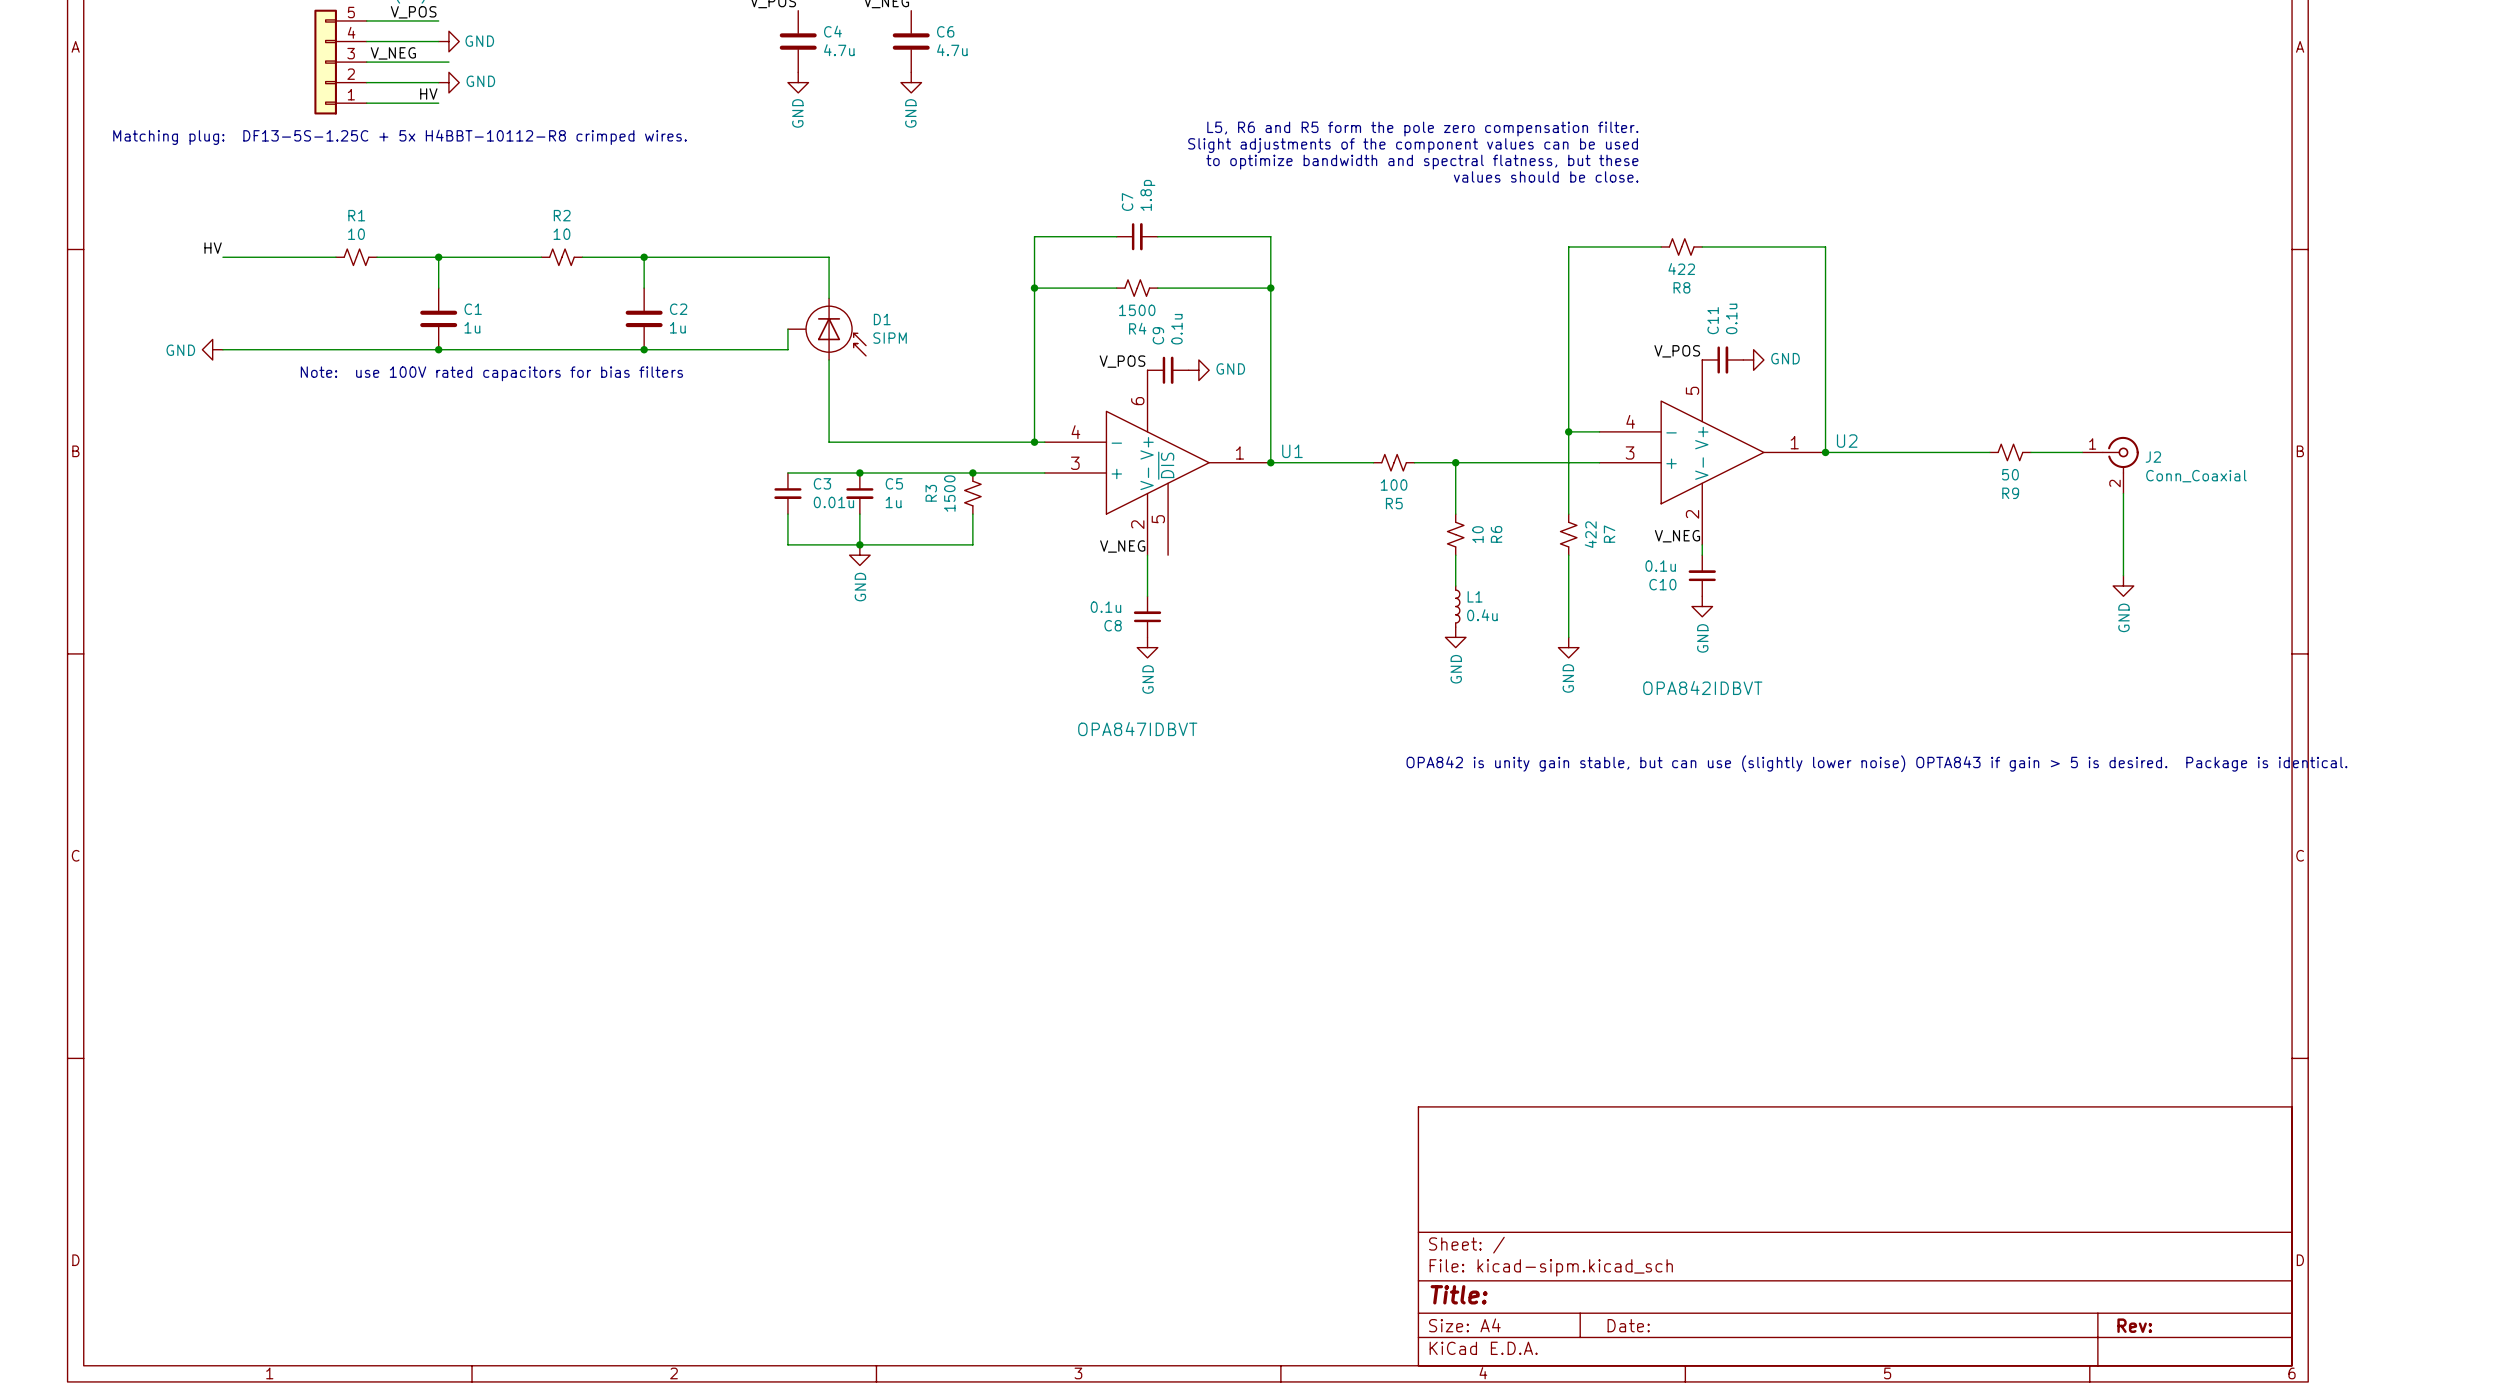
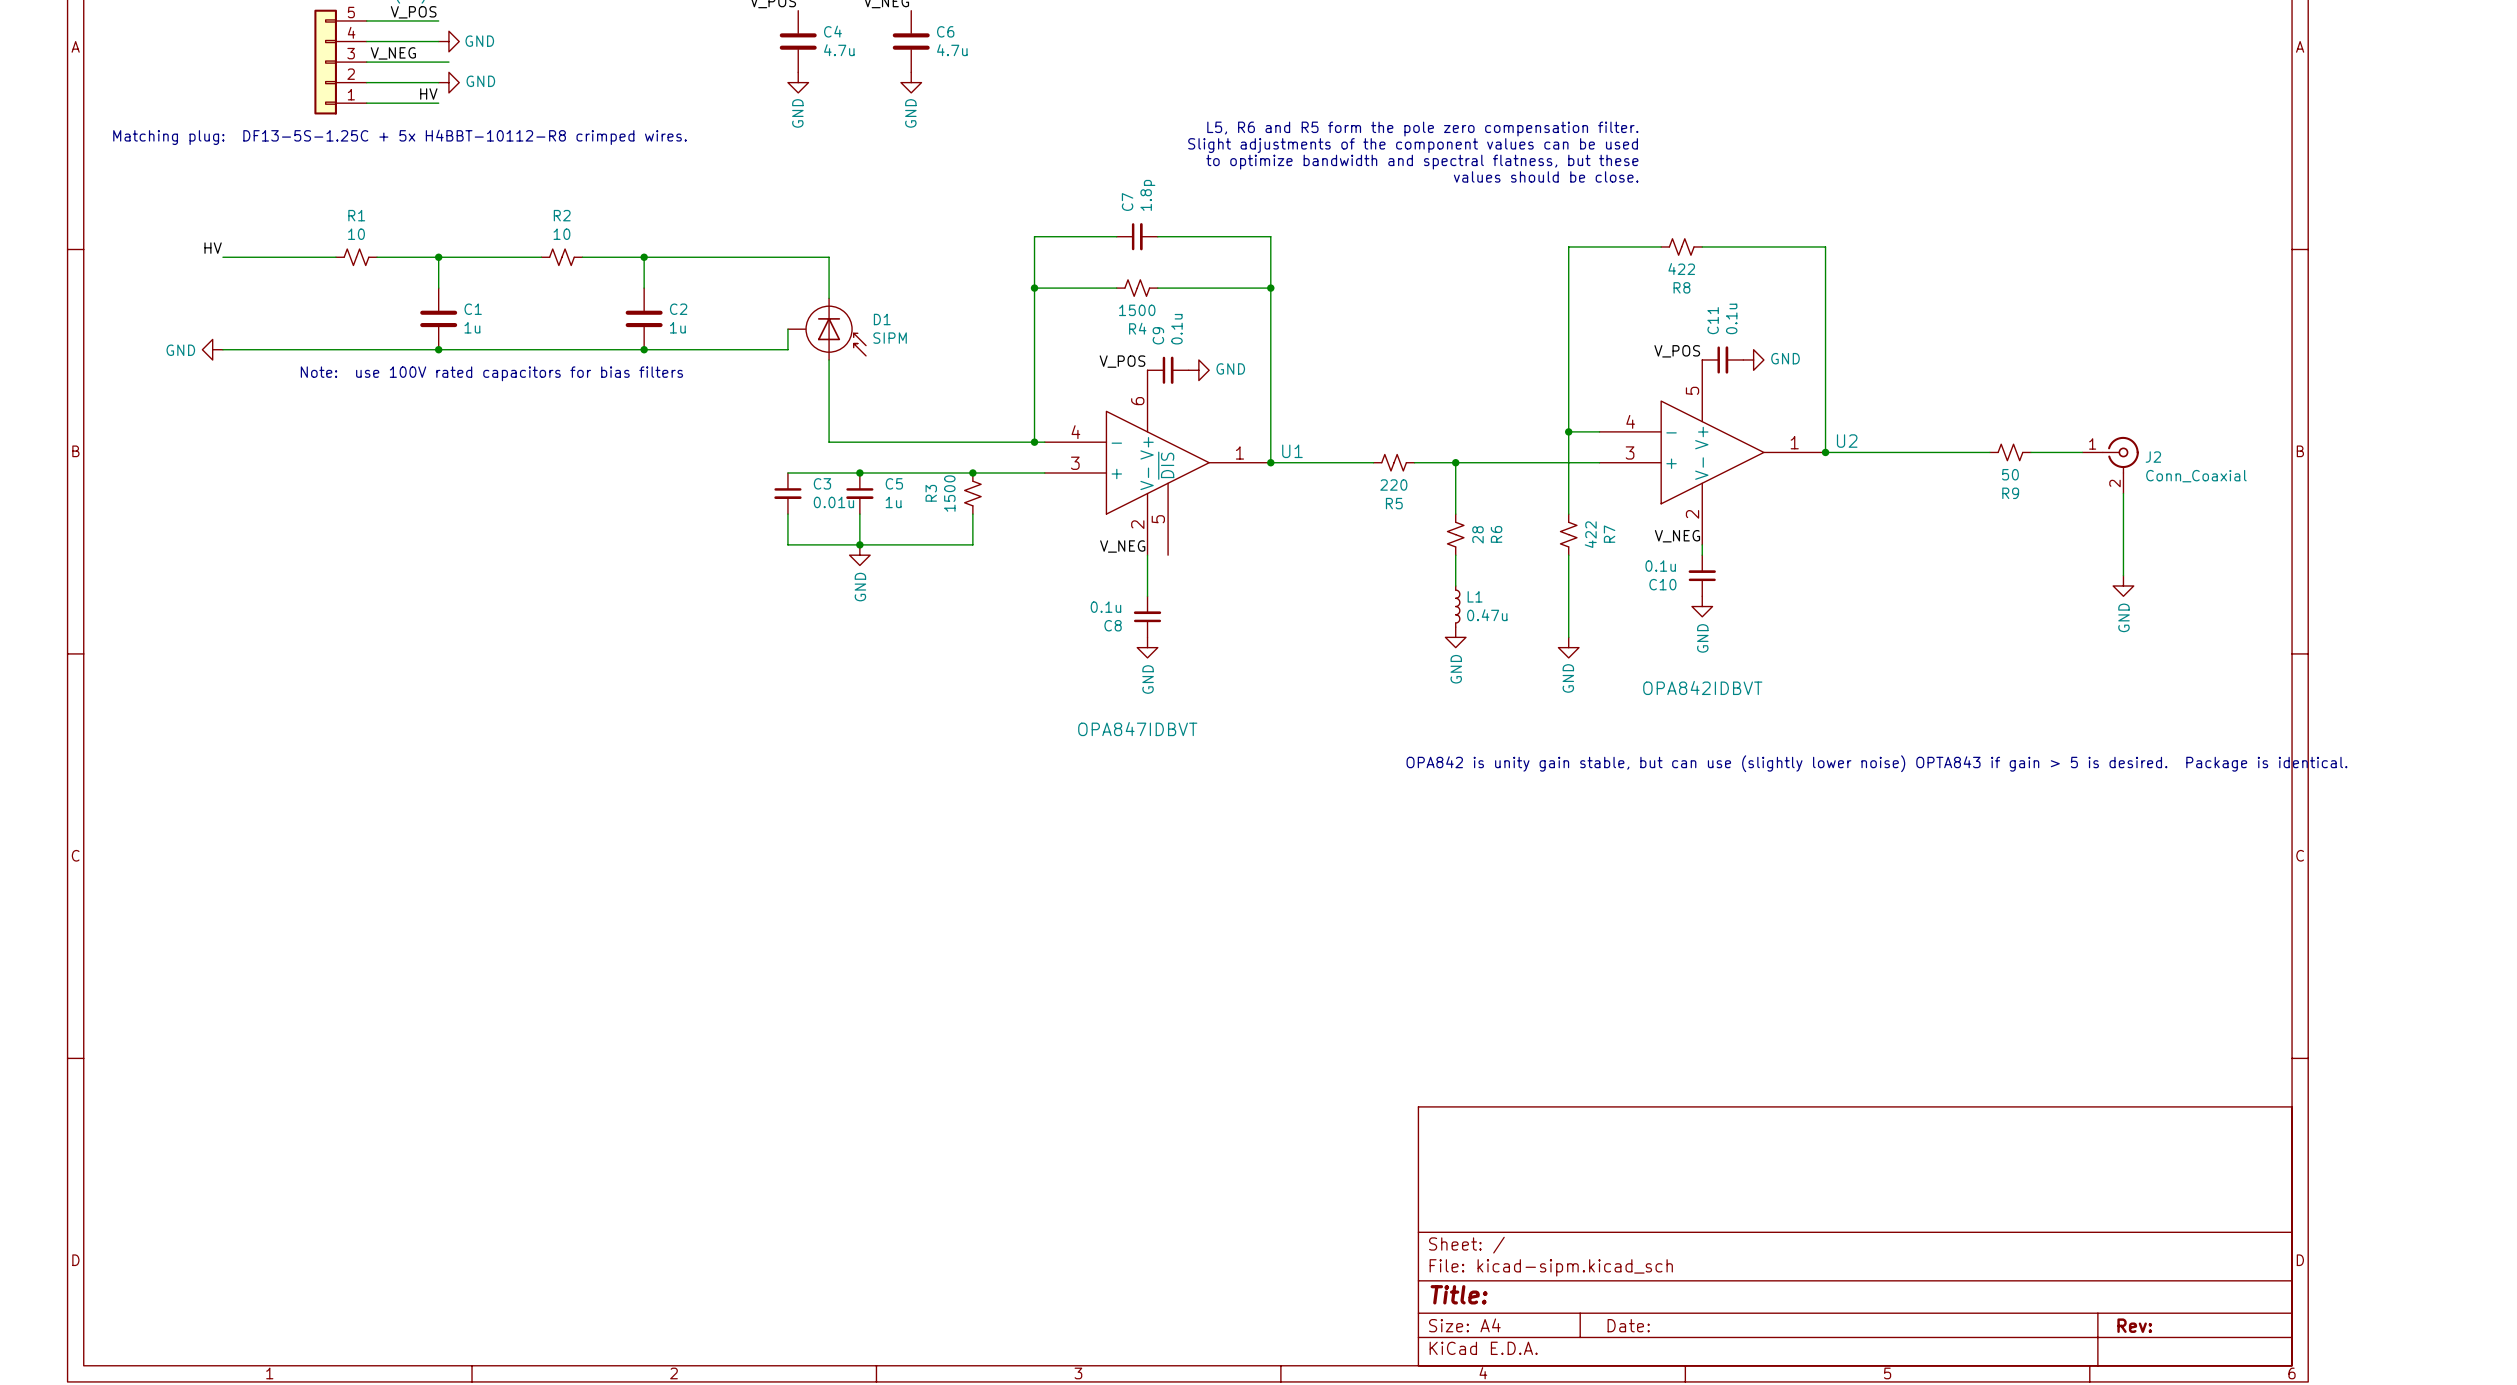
R5 value: 100 (1394, 484) -> 220 (1393, 484)
R6 value: 10 (1477, 534) -> 28 (1477, 534)
L1 value: 0.4u (1482, 615) -> 0.47u (1487, 615)

